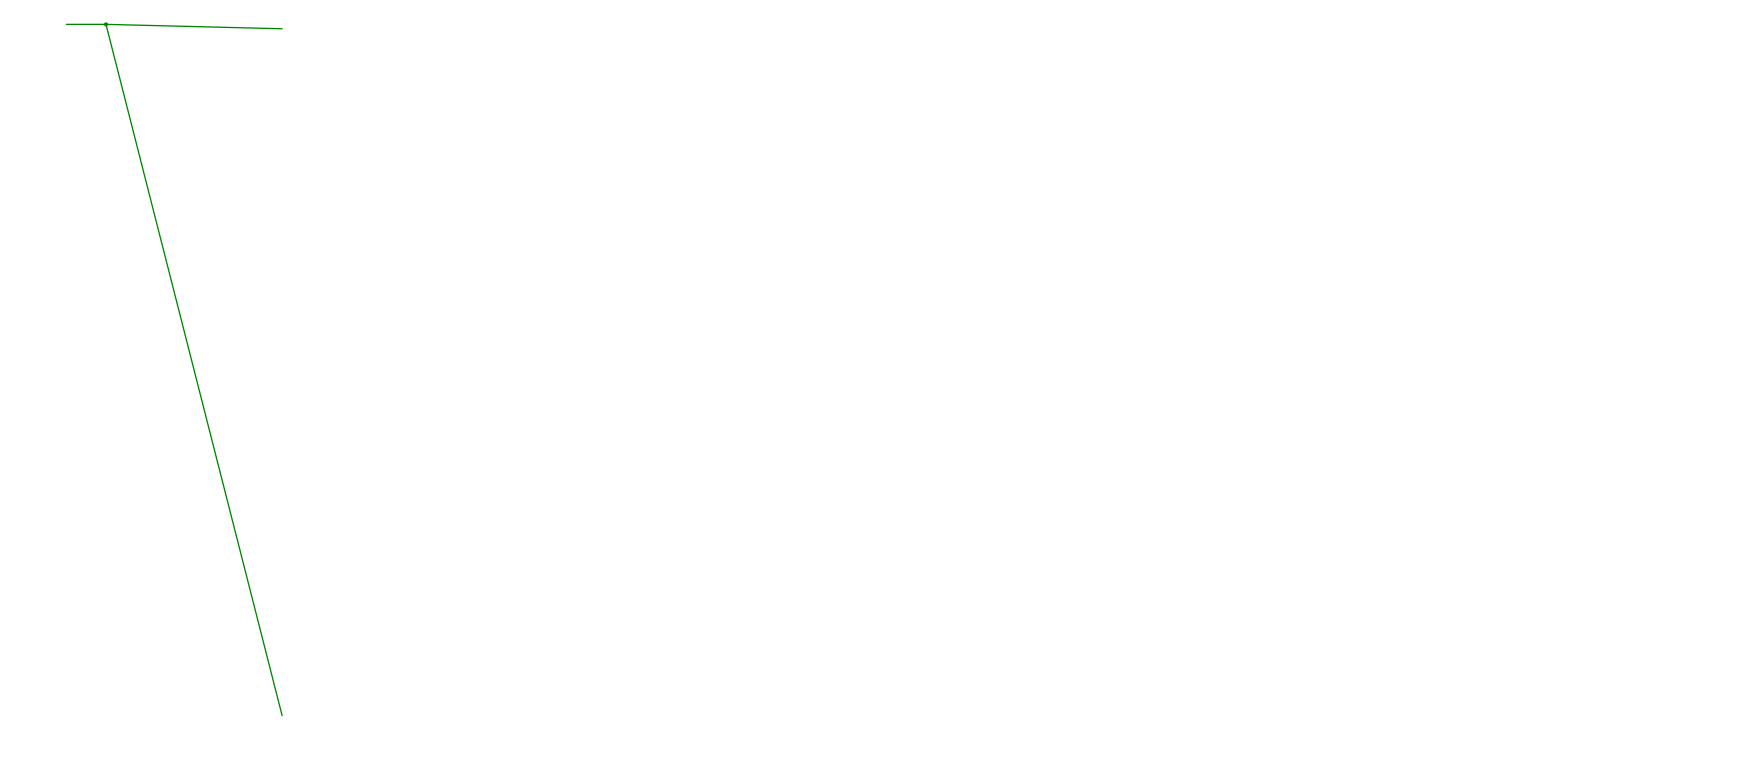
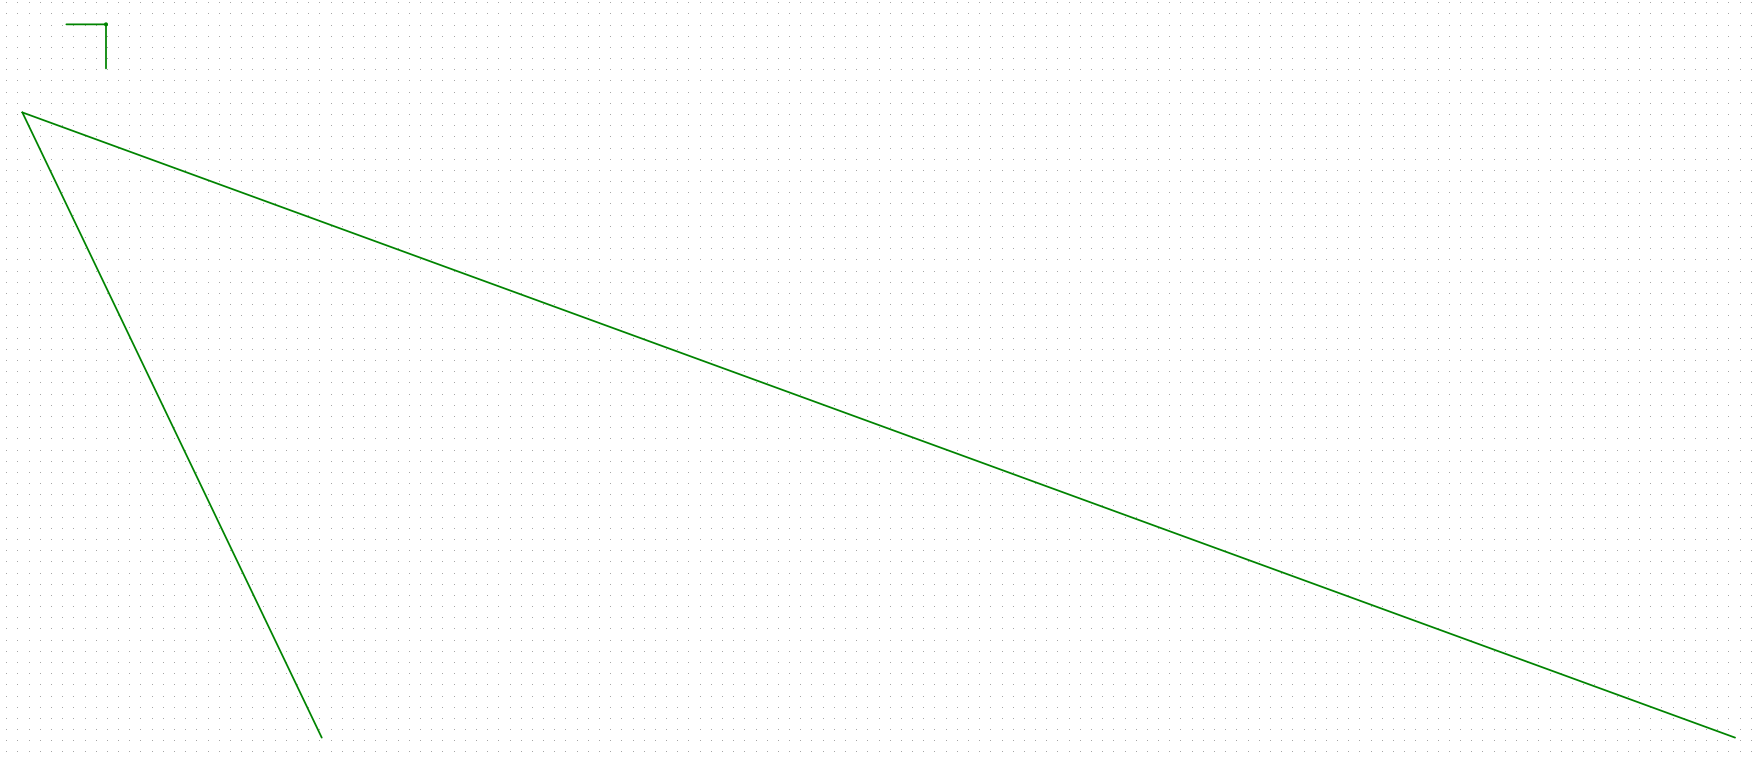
wire: none -> (106, 24) (106, 68)
wire: (282, 28) (106, 24) (282, 715) -> none
wire: none -> (321, 737) (22, 112) (1735, 737)

